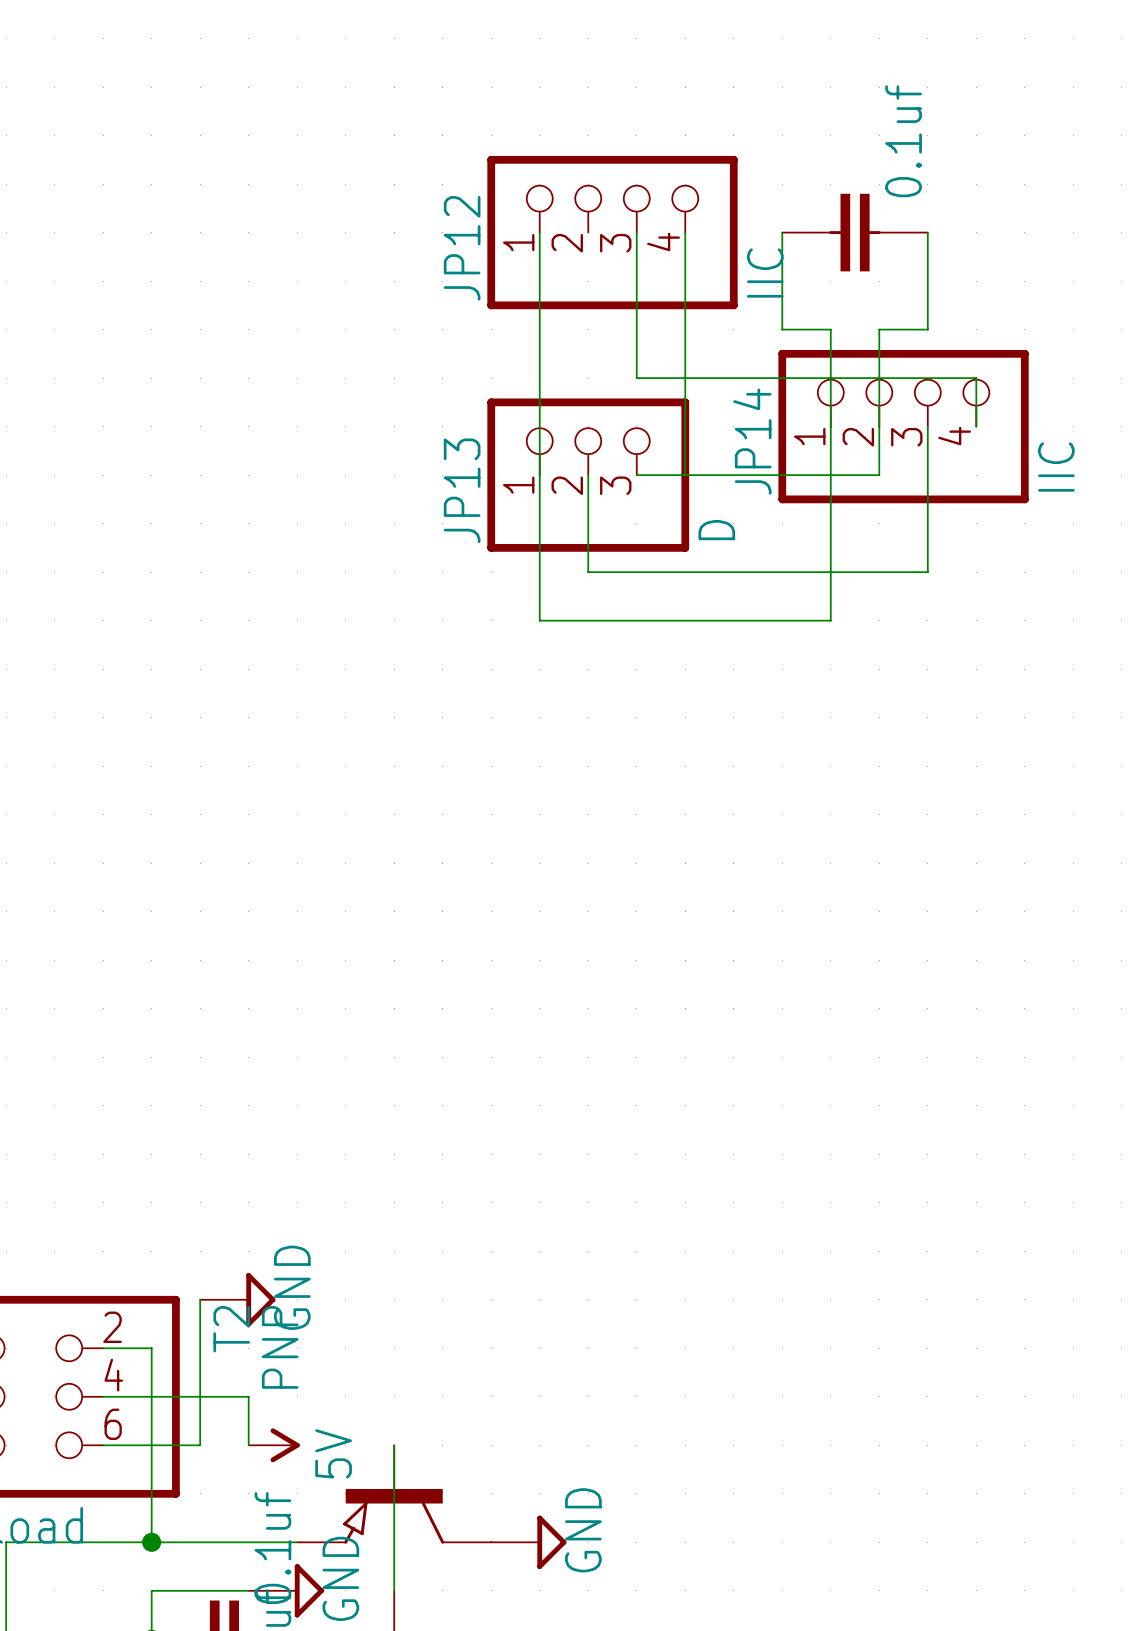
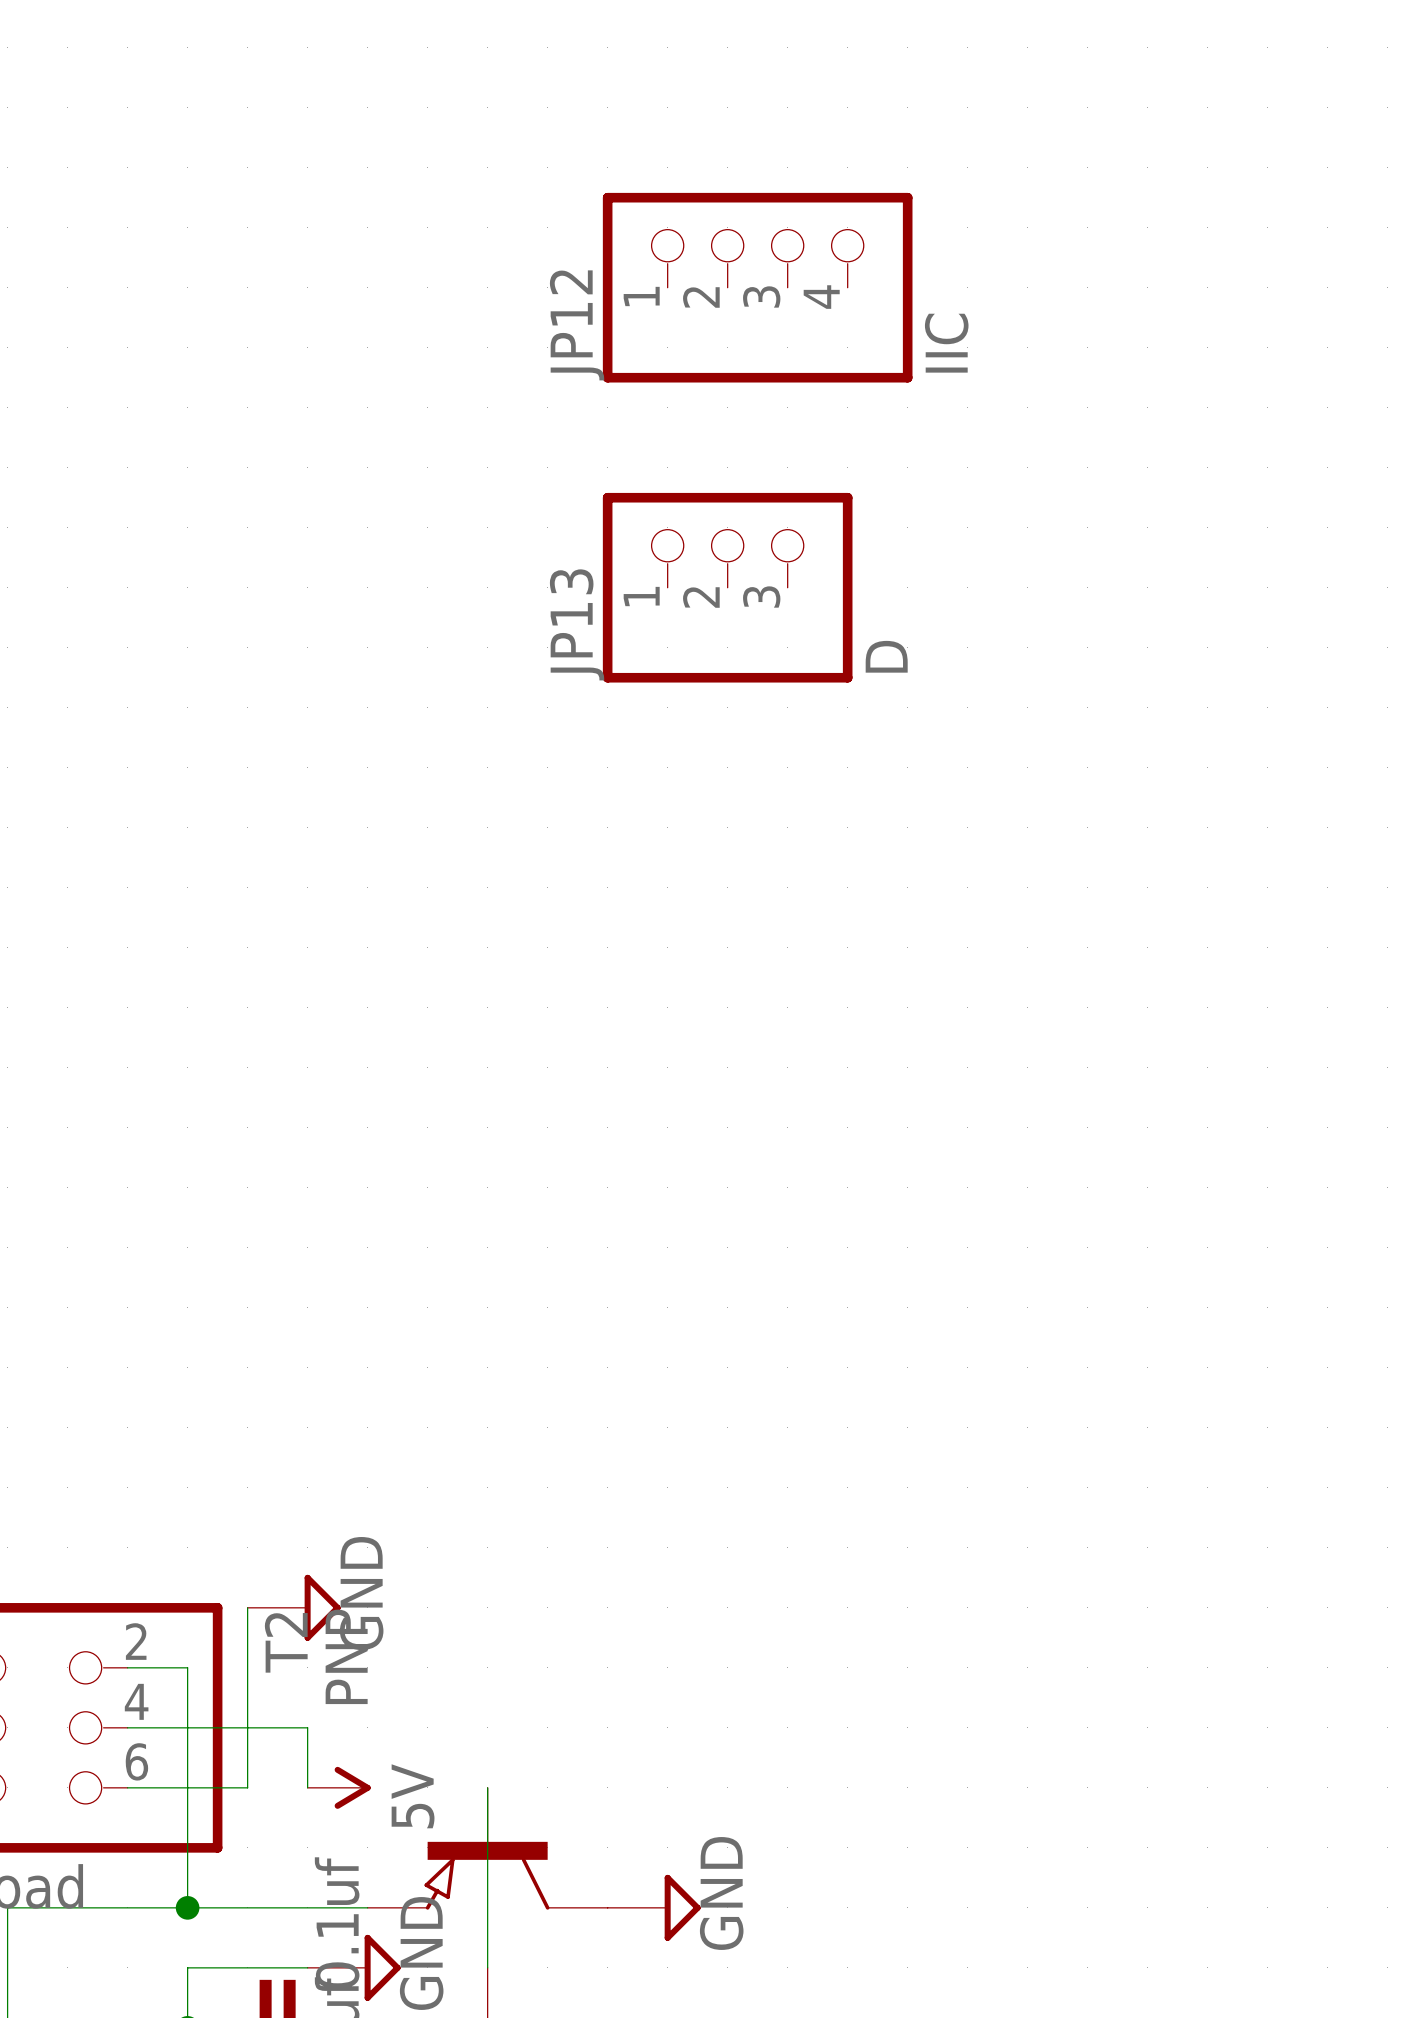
wire: (539, 232) (539, 620) (830, 620) (830, 329) (782, 329) (782, 232) -> none
wire: (636, 232) (636, 378) (976, 378) (976, 426) -> none
wire: (685, 232) (685, 475) -> none
part: 0.1uf (855, 232) -> none
wire: (927, 232) (927, 329) (879, 329) (879, 475) (636, 475) -> none
JP14: IIC (903, 426) -> none
wire: (927, 426) (927, 572) (588, 572) (588, 475) -> none

